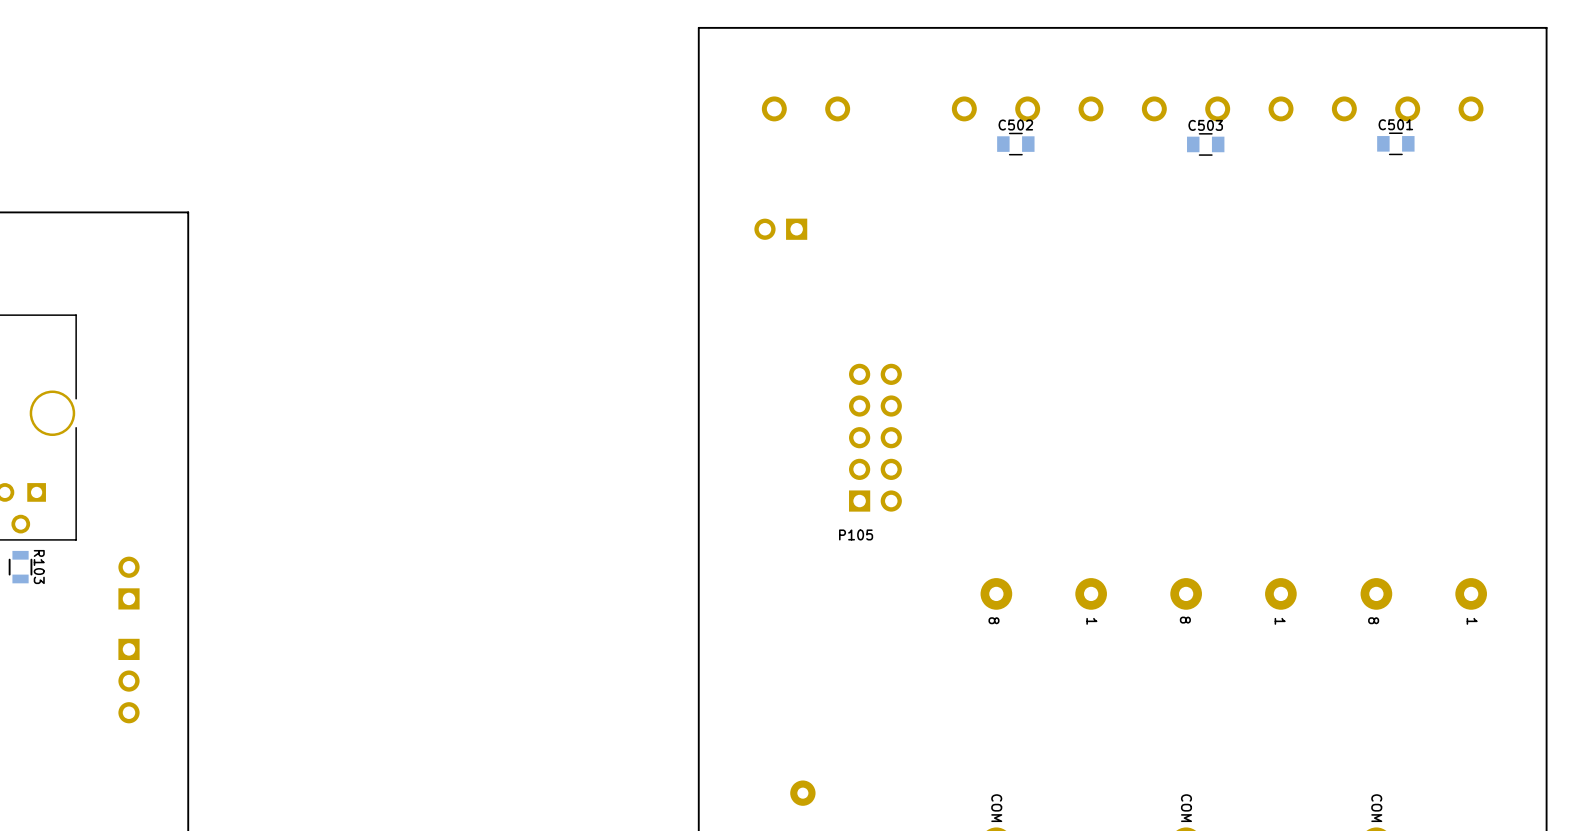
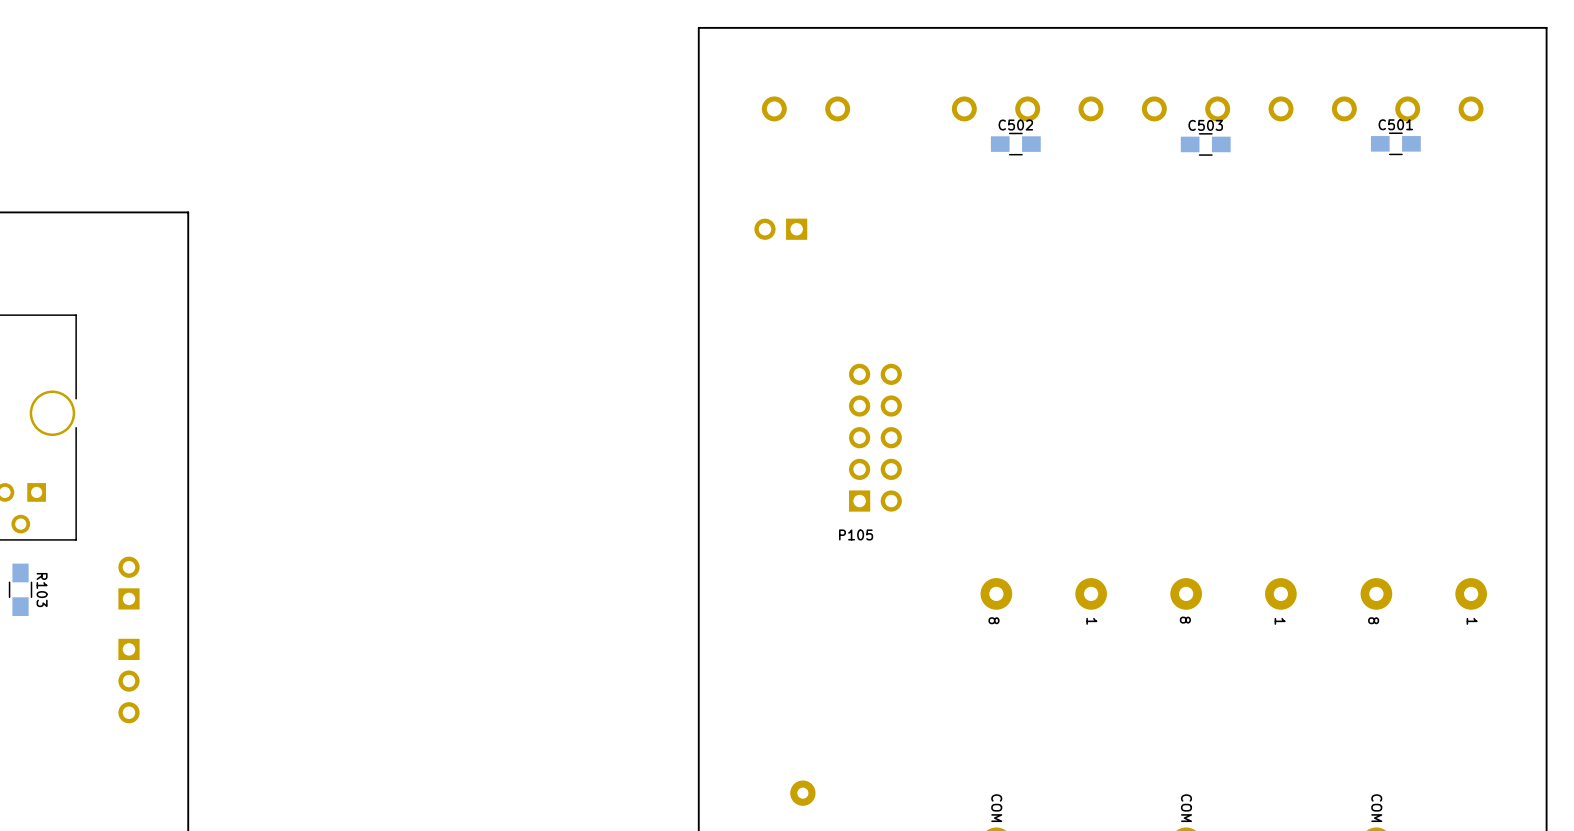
C502 footprint: [997, 132, 1035, 156] -> [990, 132, 1041, 156]
C501 footprint: [1377, 132, 1415, 156] -> [1370, 132, 1421, 156]
C503 footprint: [1187, 133, 1225, 156] -> [1180, 133, 1231, 156]
R103 footprint: [8, 550, 33, 584] -> [8, 563, 33, 616]

